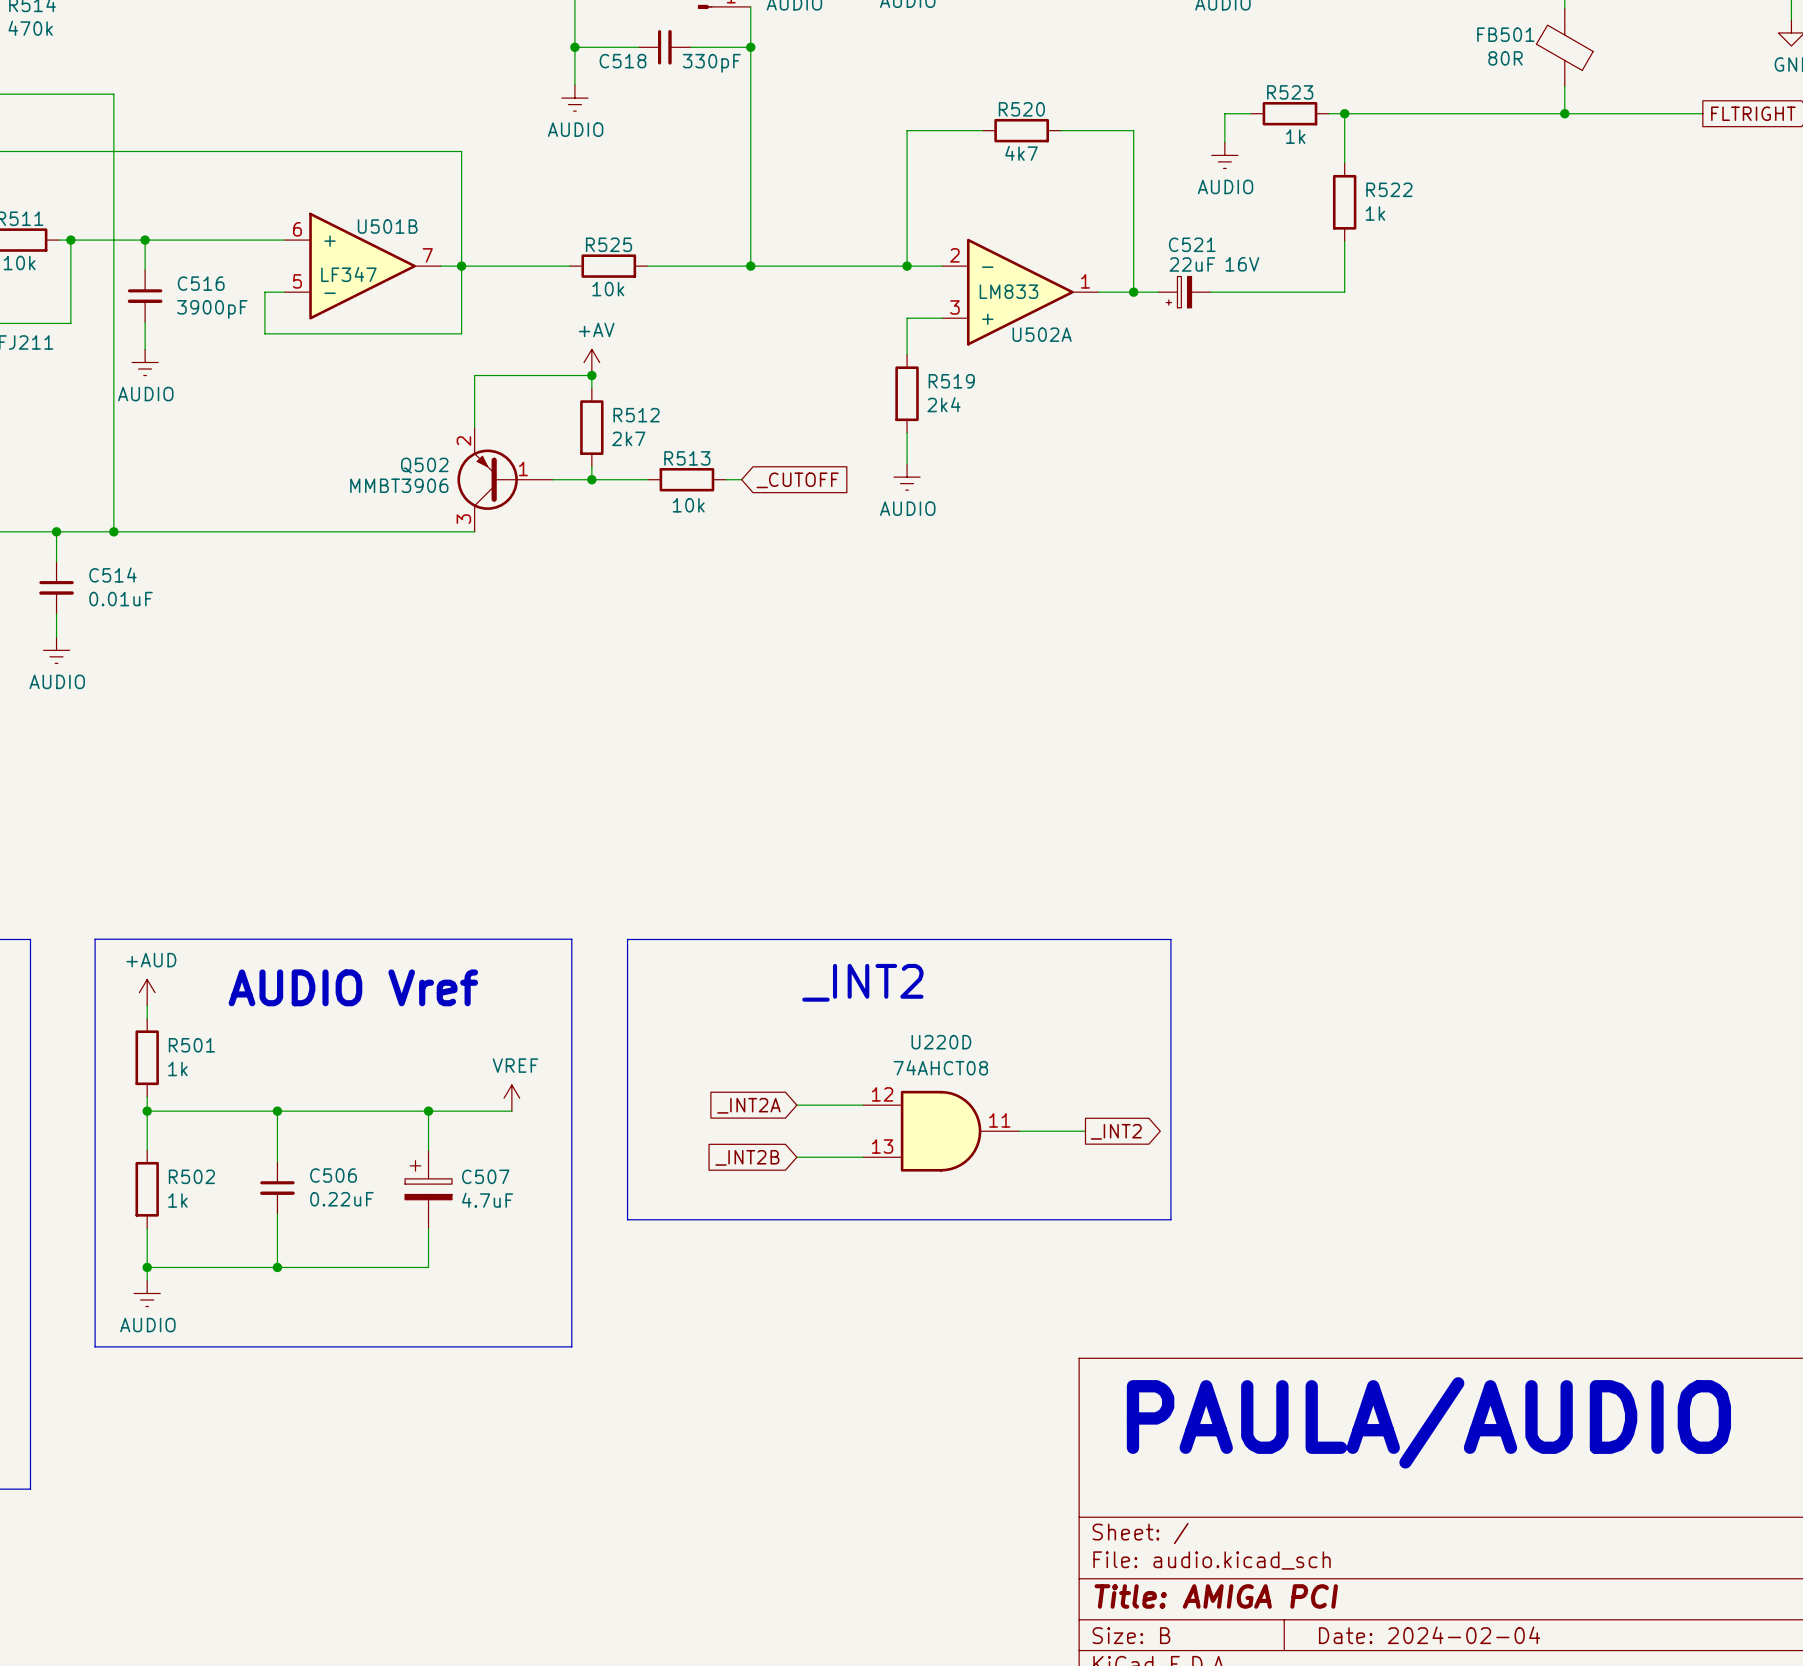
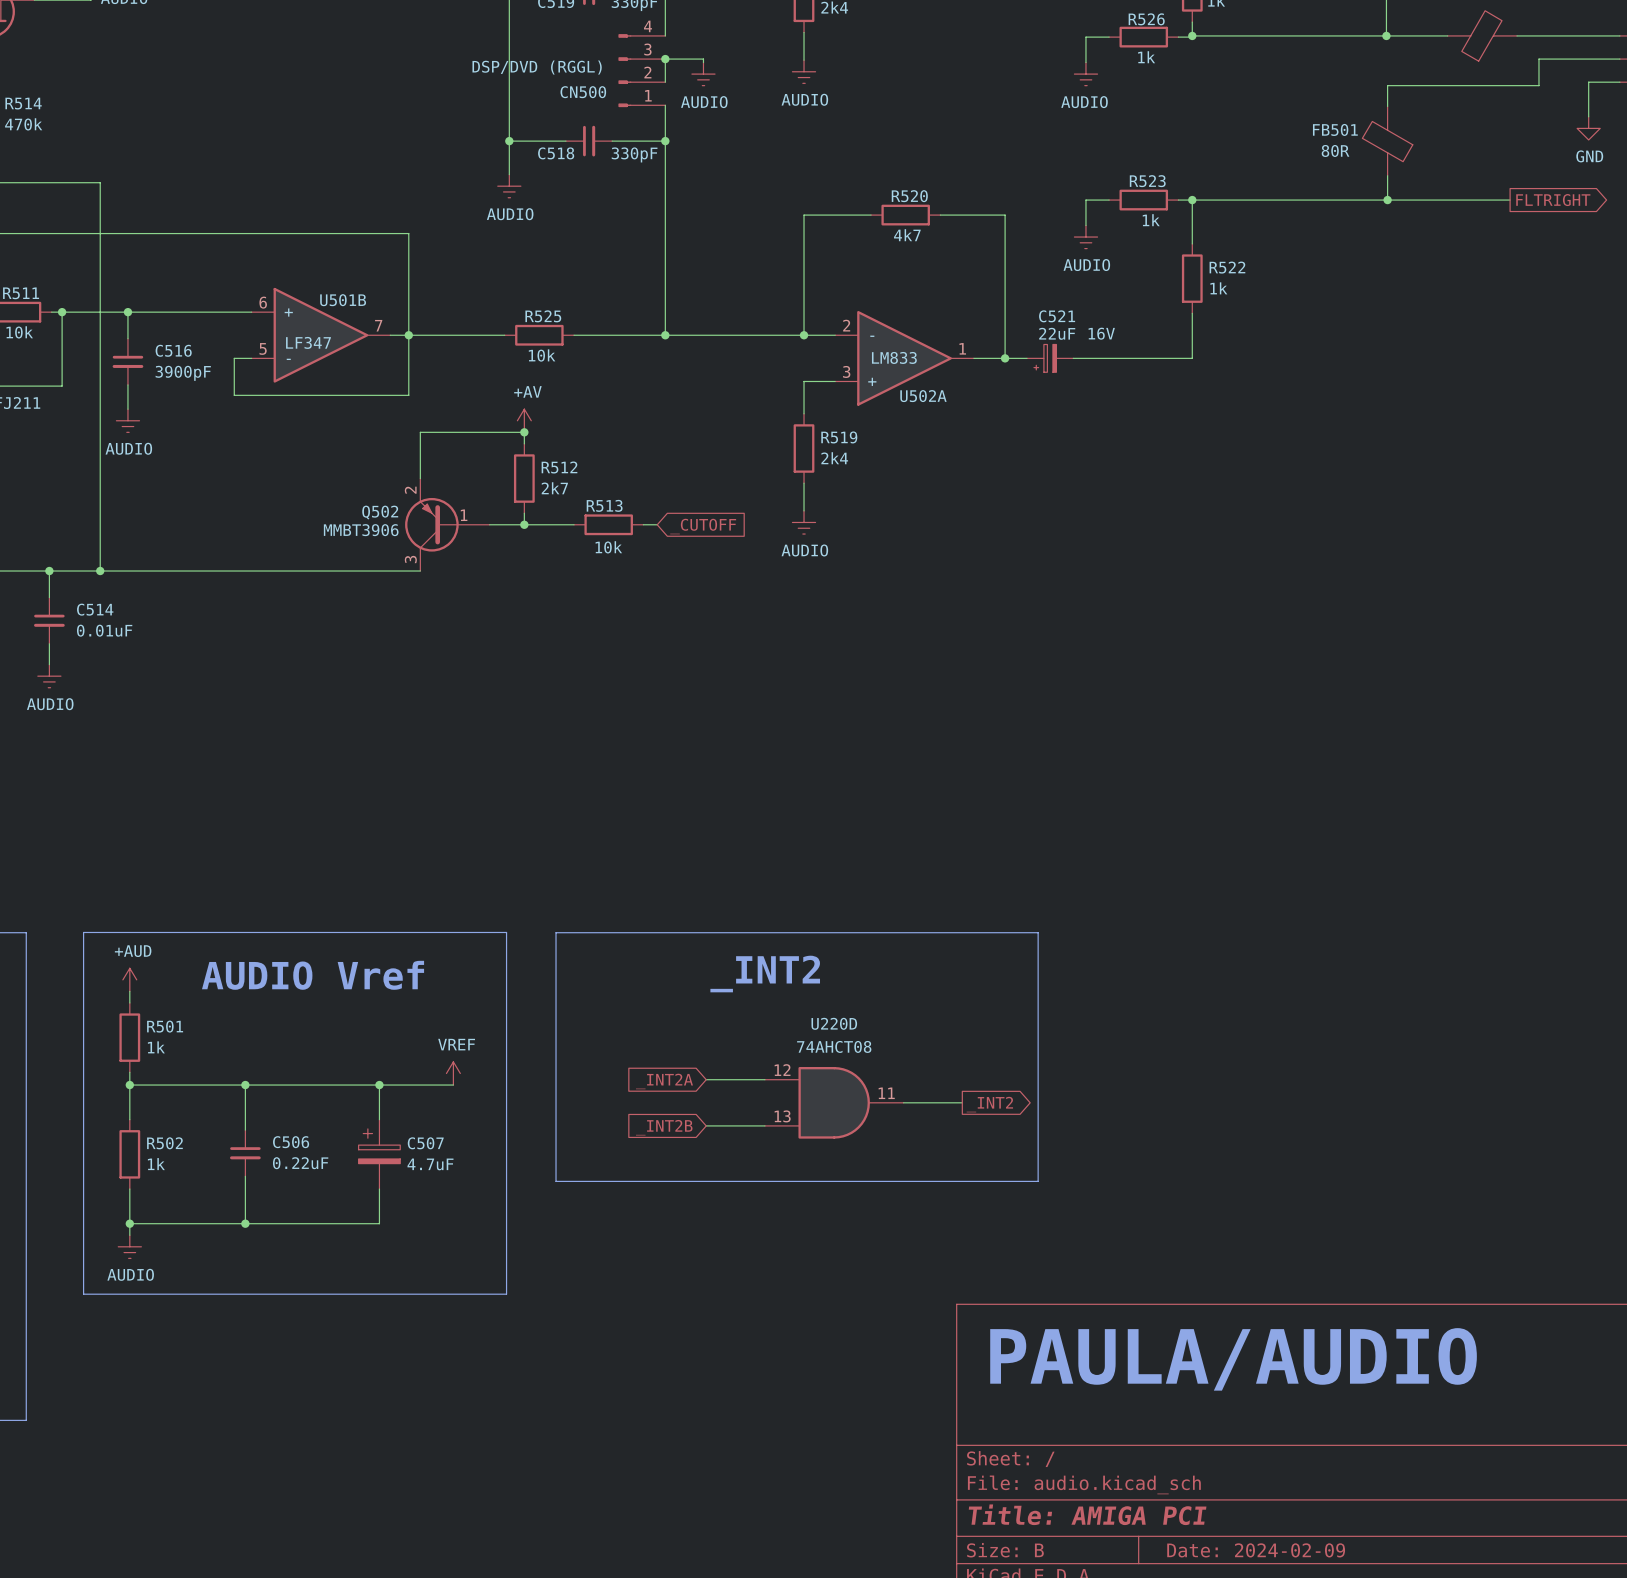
title block: Date: 2024-02-04 (1429, 1635) -> Date: 2024-02-09 (1256, 1550)

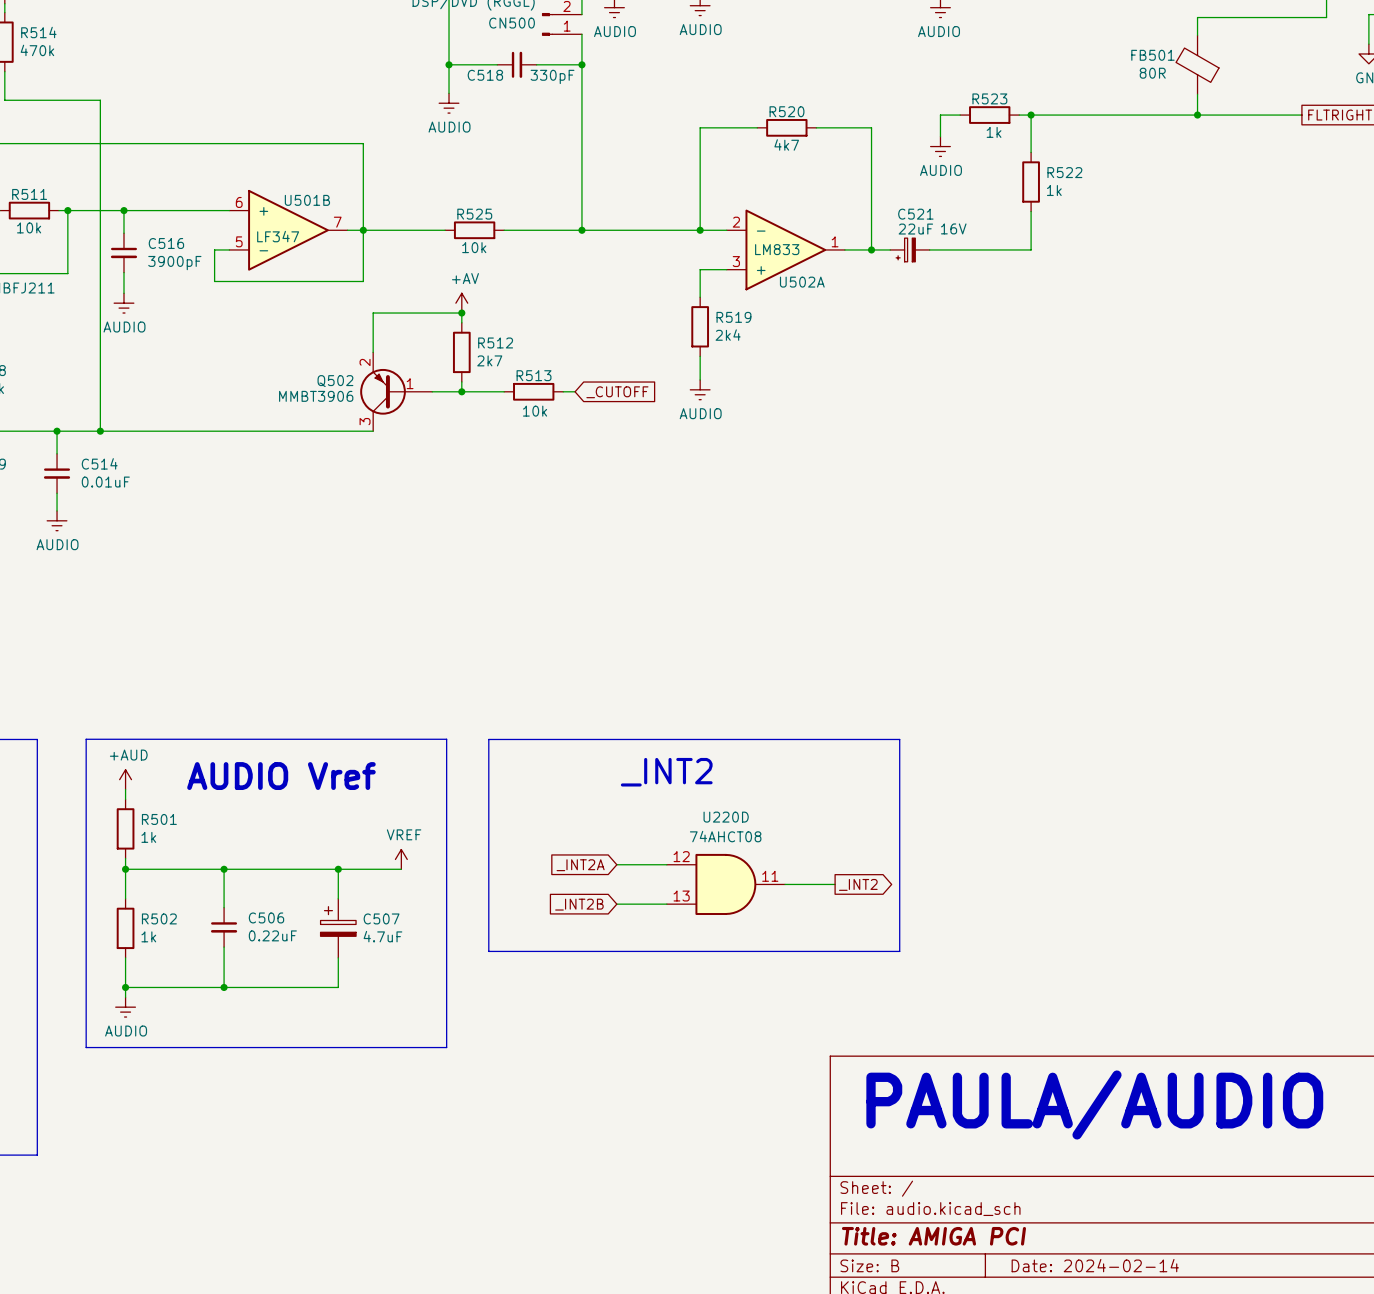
title block: Date: 2024-02-09 (1256, 1550) -> Date: 2024-02-14 (1095, 1265)

